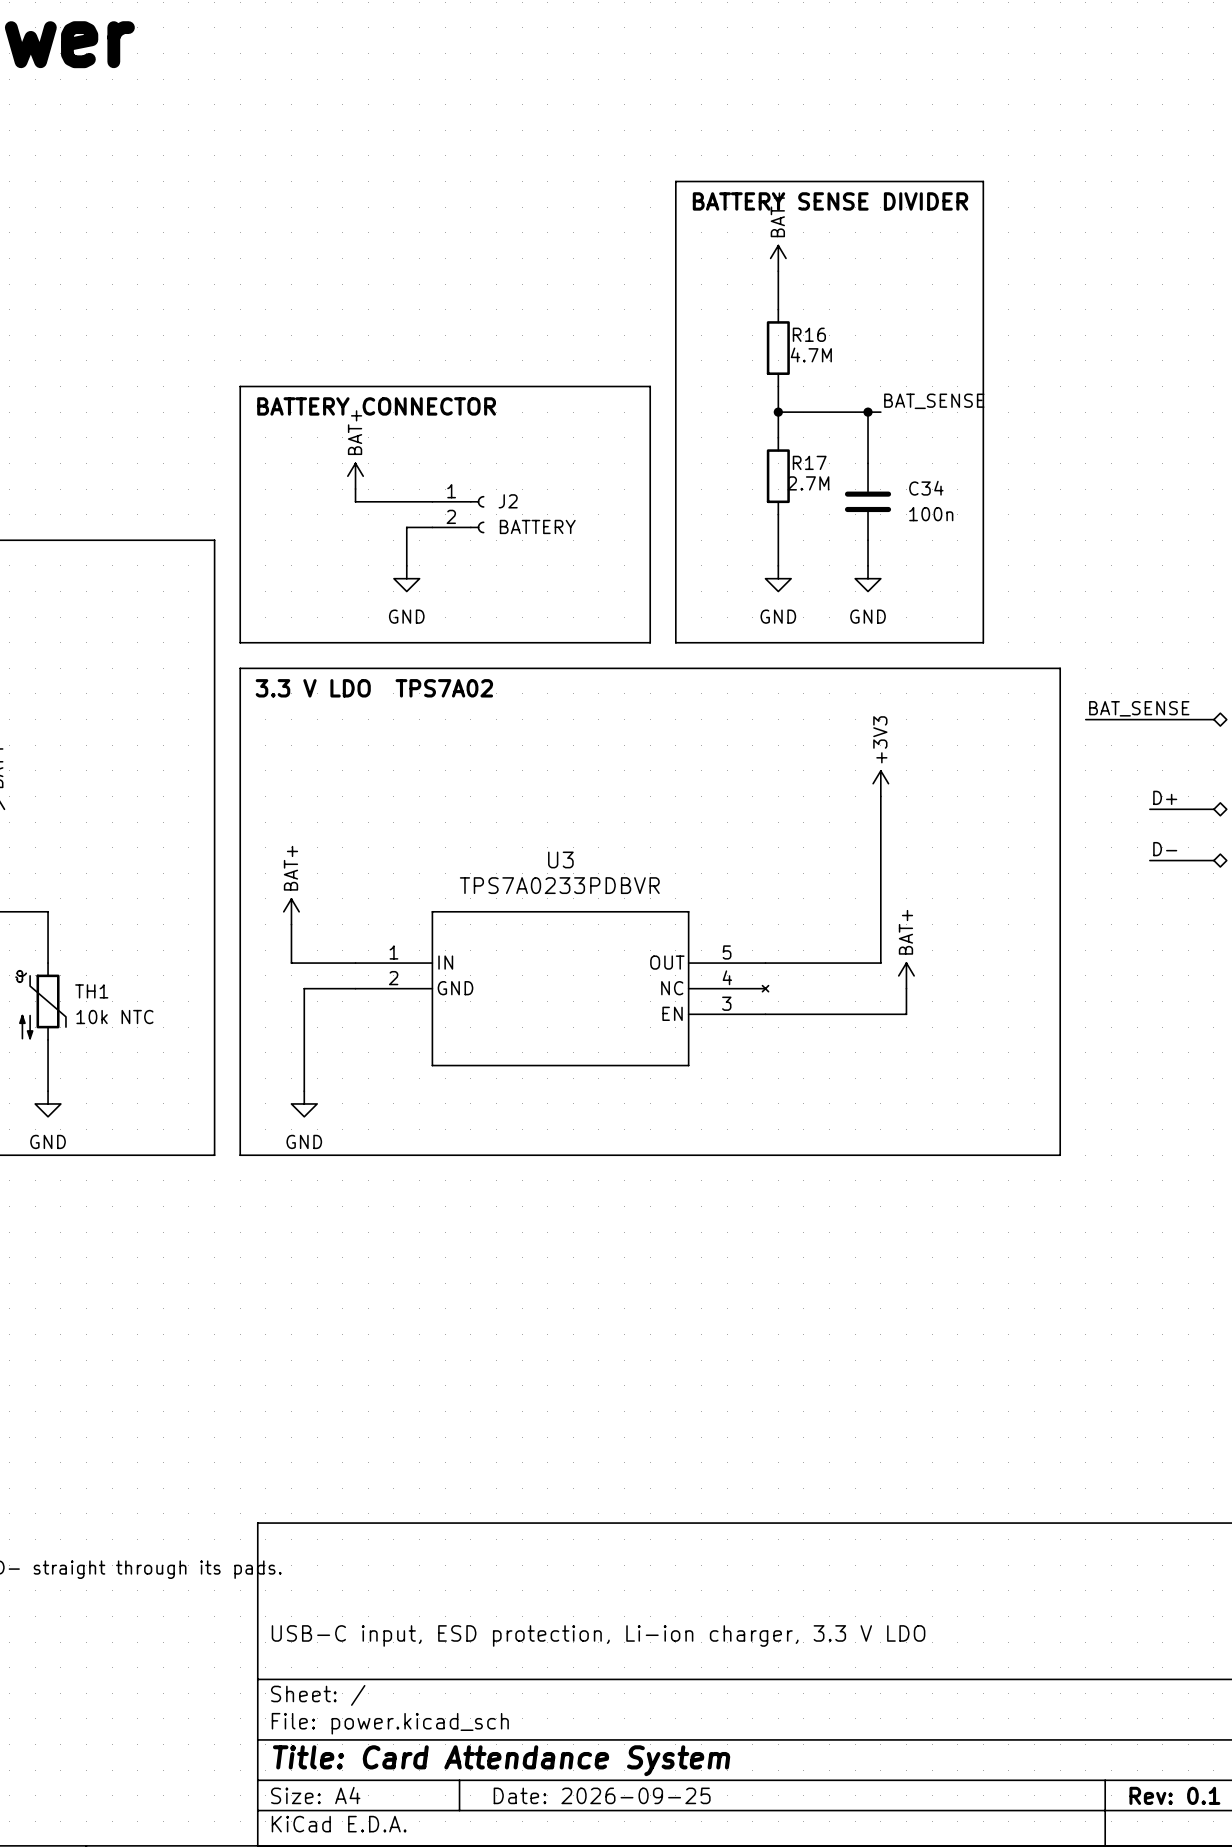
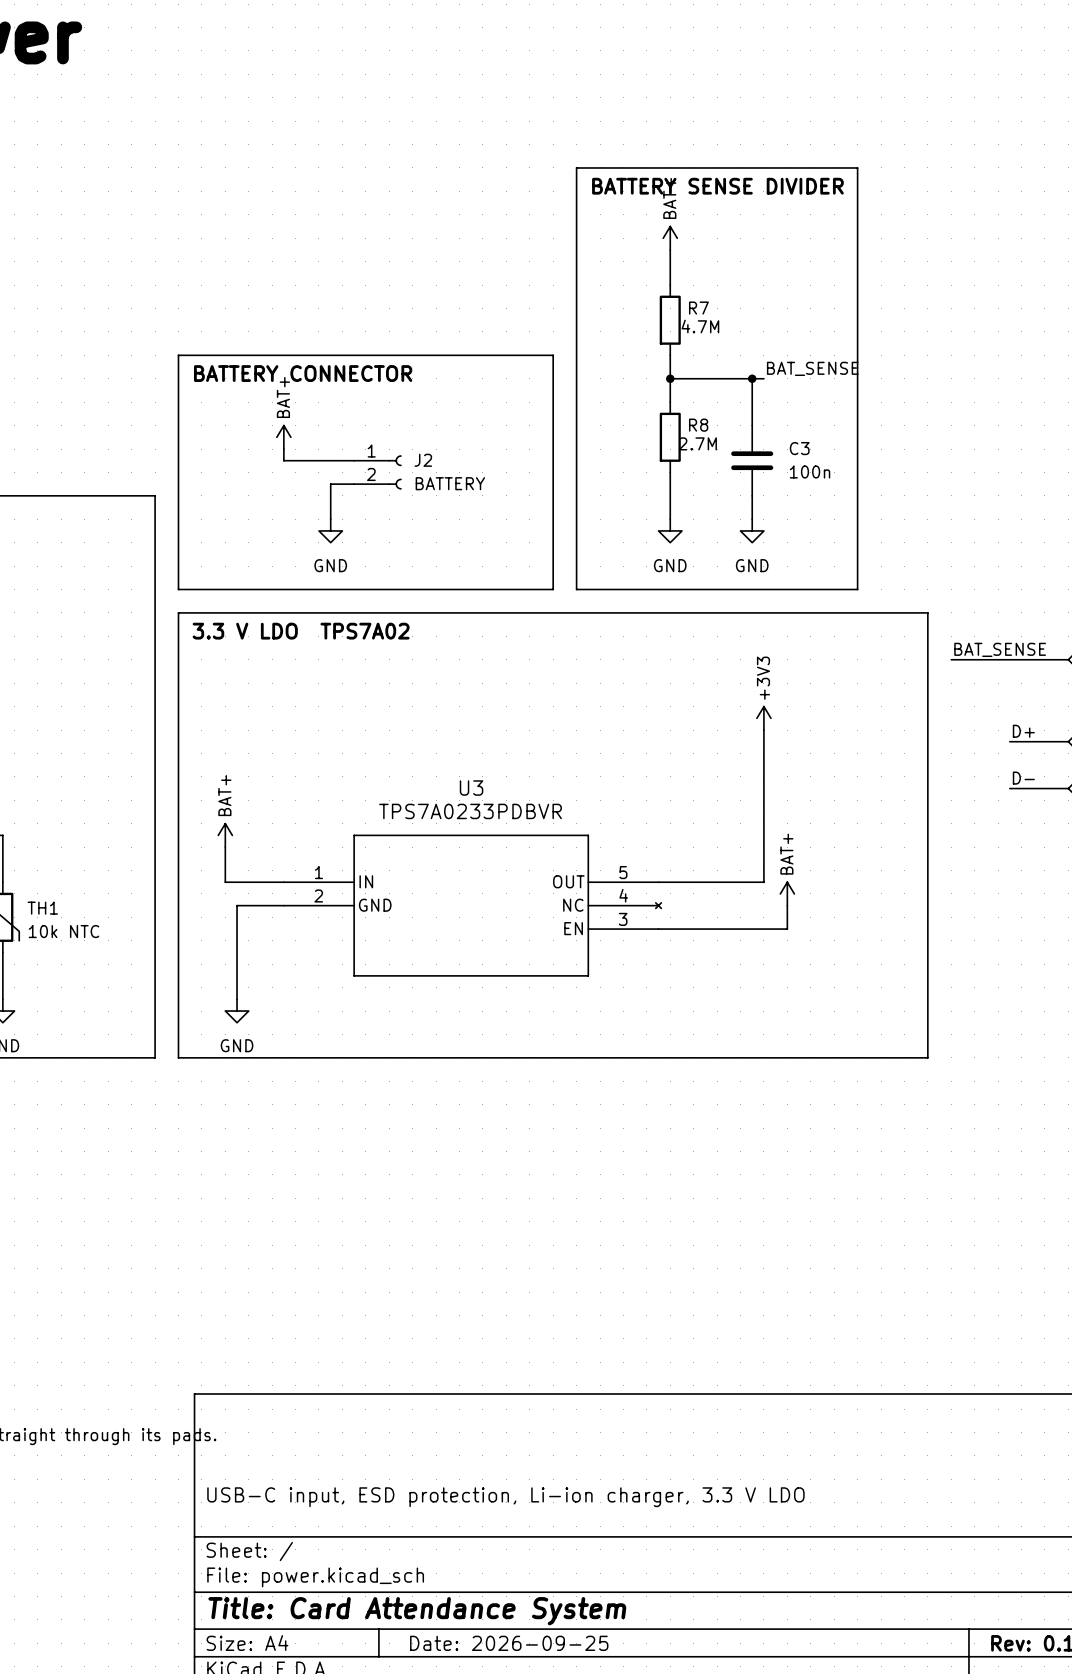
R16 name: R16 (809, 334) -> R7 (698, 308)
R17 name: R17 (809, 462) -> R8 (698, 425)
C34 name: C34 (926, 488) -> C3 (799, 448)

